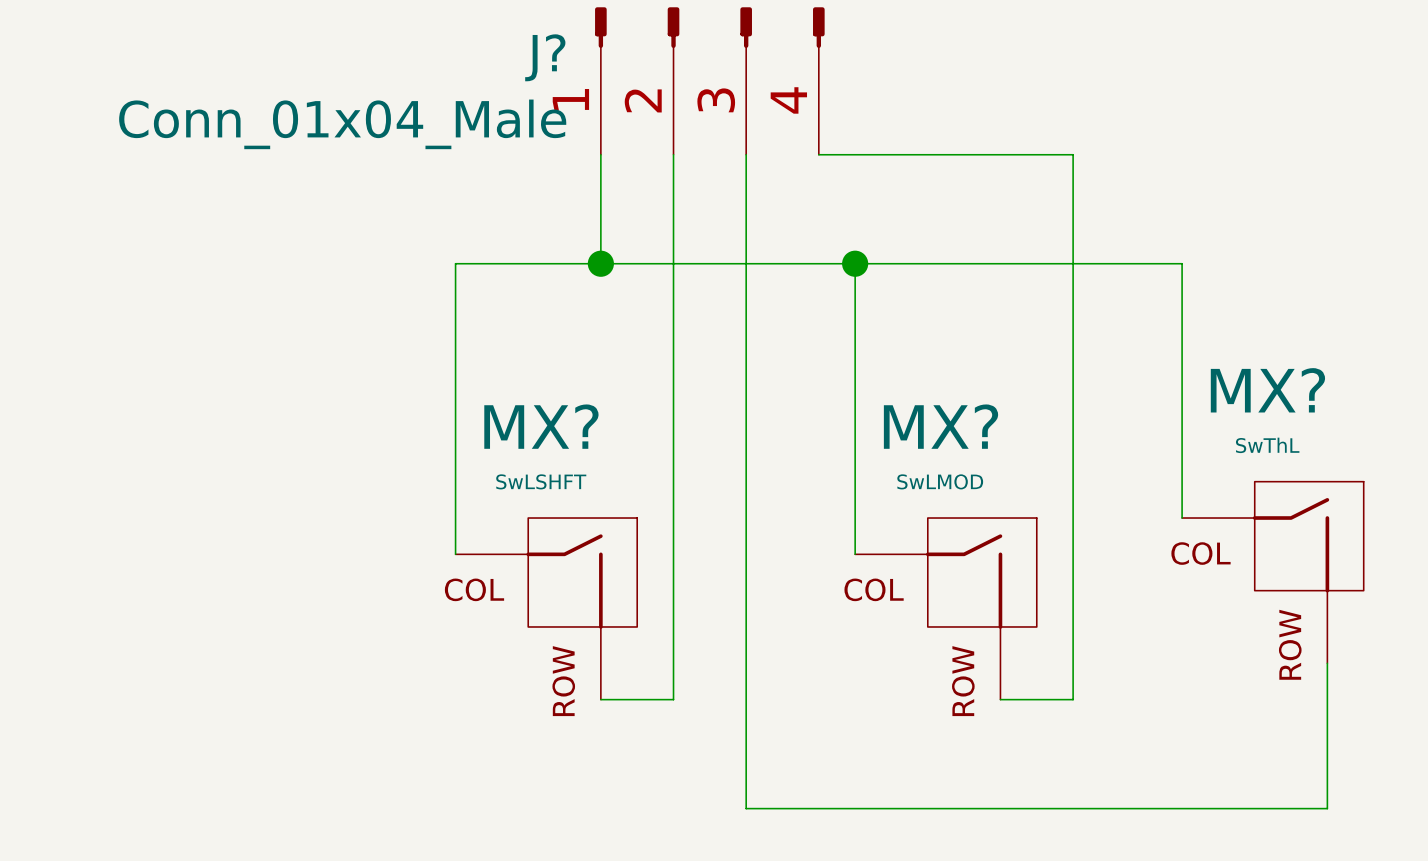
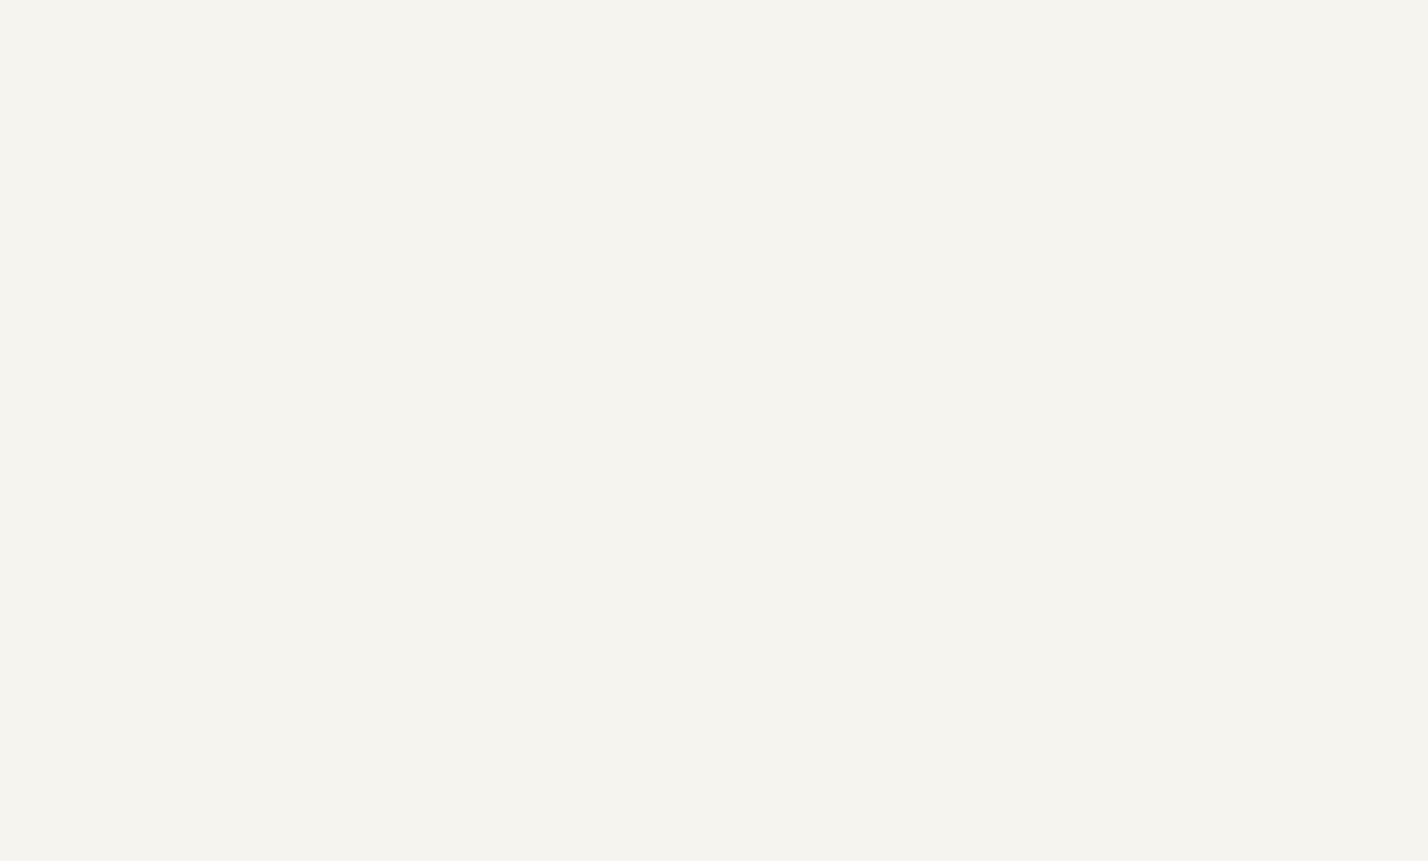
J?: Conn_01x04_Male (709, 81) -> none
wire: (600, 154) (600, 263) -> none
wire: (673, 154) (673, 699) (600, 699) -> none
wire: (746, 154) (746, 808) (1327, 808) (1327, 663) -> none
wire: (818, 154) (1073, 154) (1073, 699) (1000, 699) -> none
junction: (600, 263) -> none
wire: (855, 263) (855, 554) -> none
junction: (855, 263) -> none
wire: (1182, 518) (1182, 263) (455, 263) (455, 554) -> none
MX?: SwThL (1272, 572) -> none
MX?: SwLSHFT (546, 608) -> none
MX?: SwLMOD (945, 608) -> none

